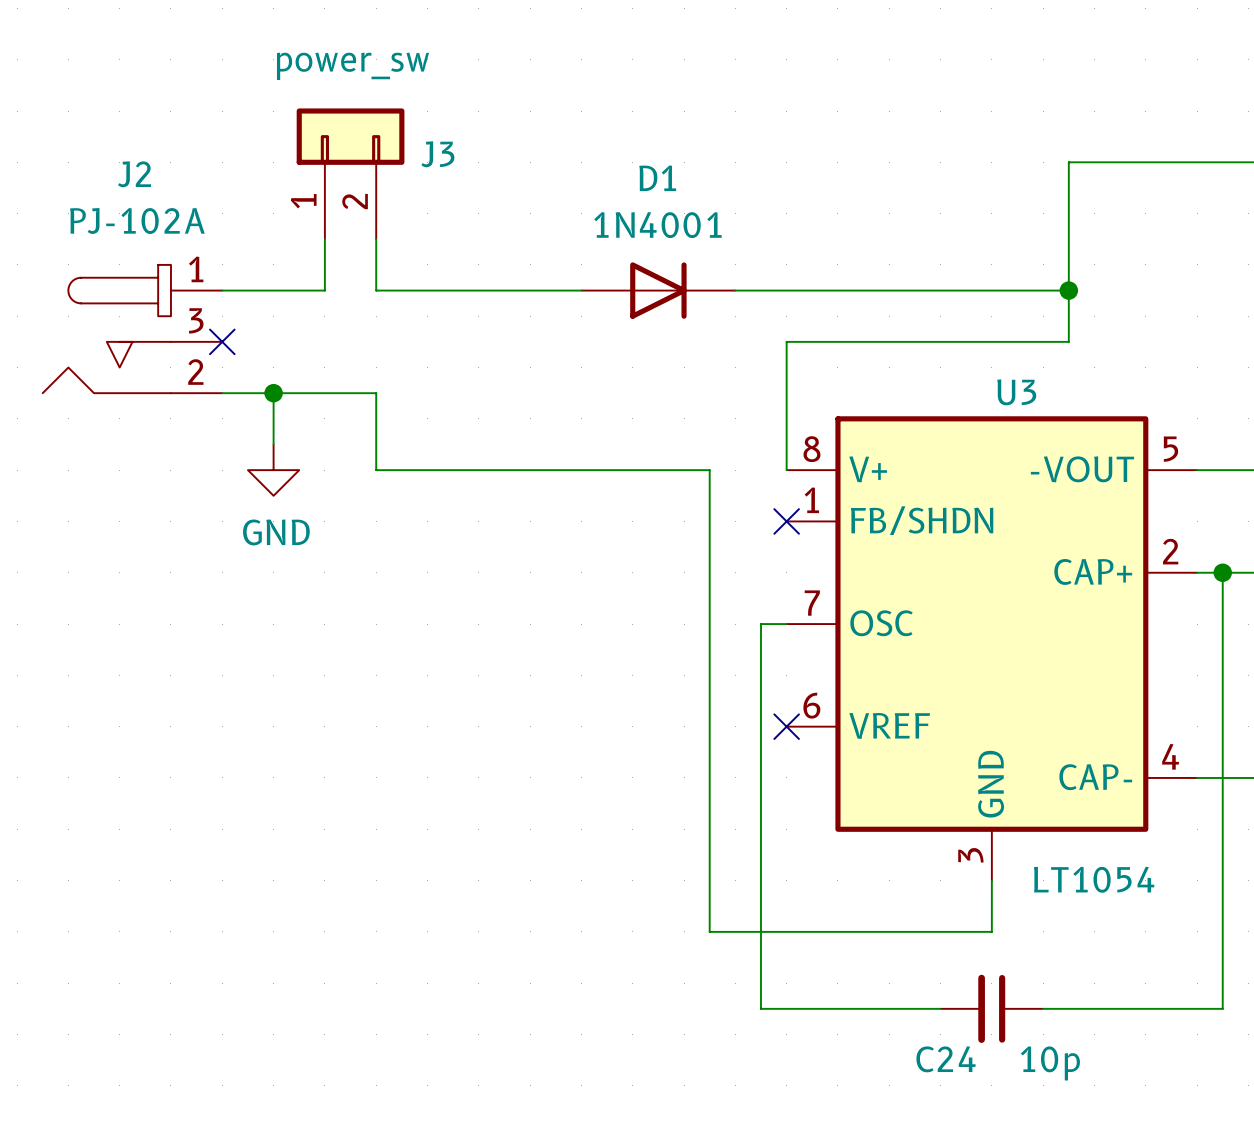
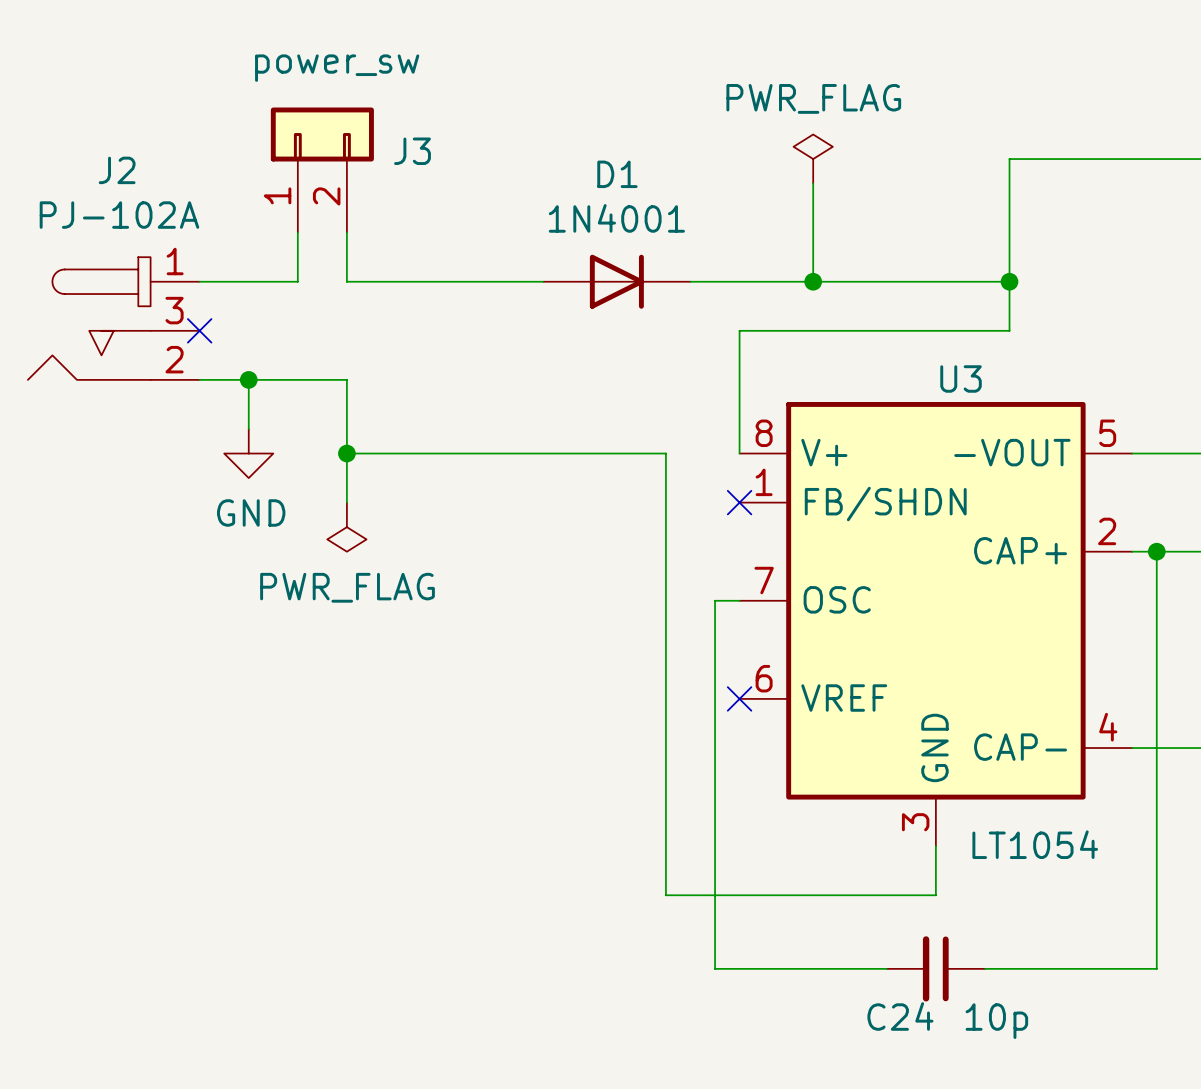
power symbol: none -> PWR_FLAG (813, 159)
wire: none -> (813, 183) (813, 281)
junction: none -> (813, 281)
wire: none -> (346, 453) (346, 502)
junction: none -> (346, 453)
power symbol: none -> PWR_FLAG (346, 527)

